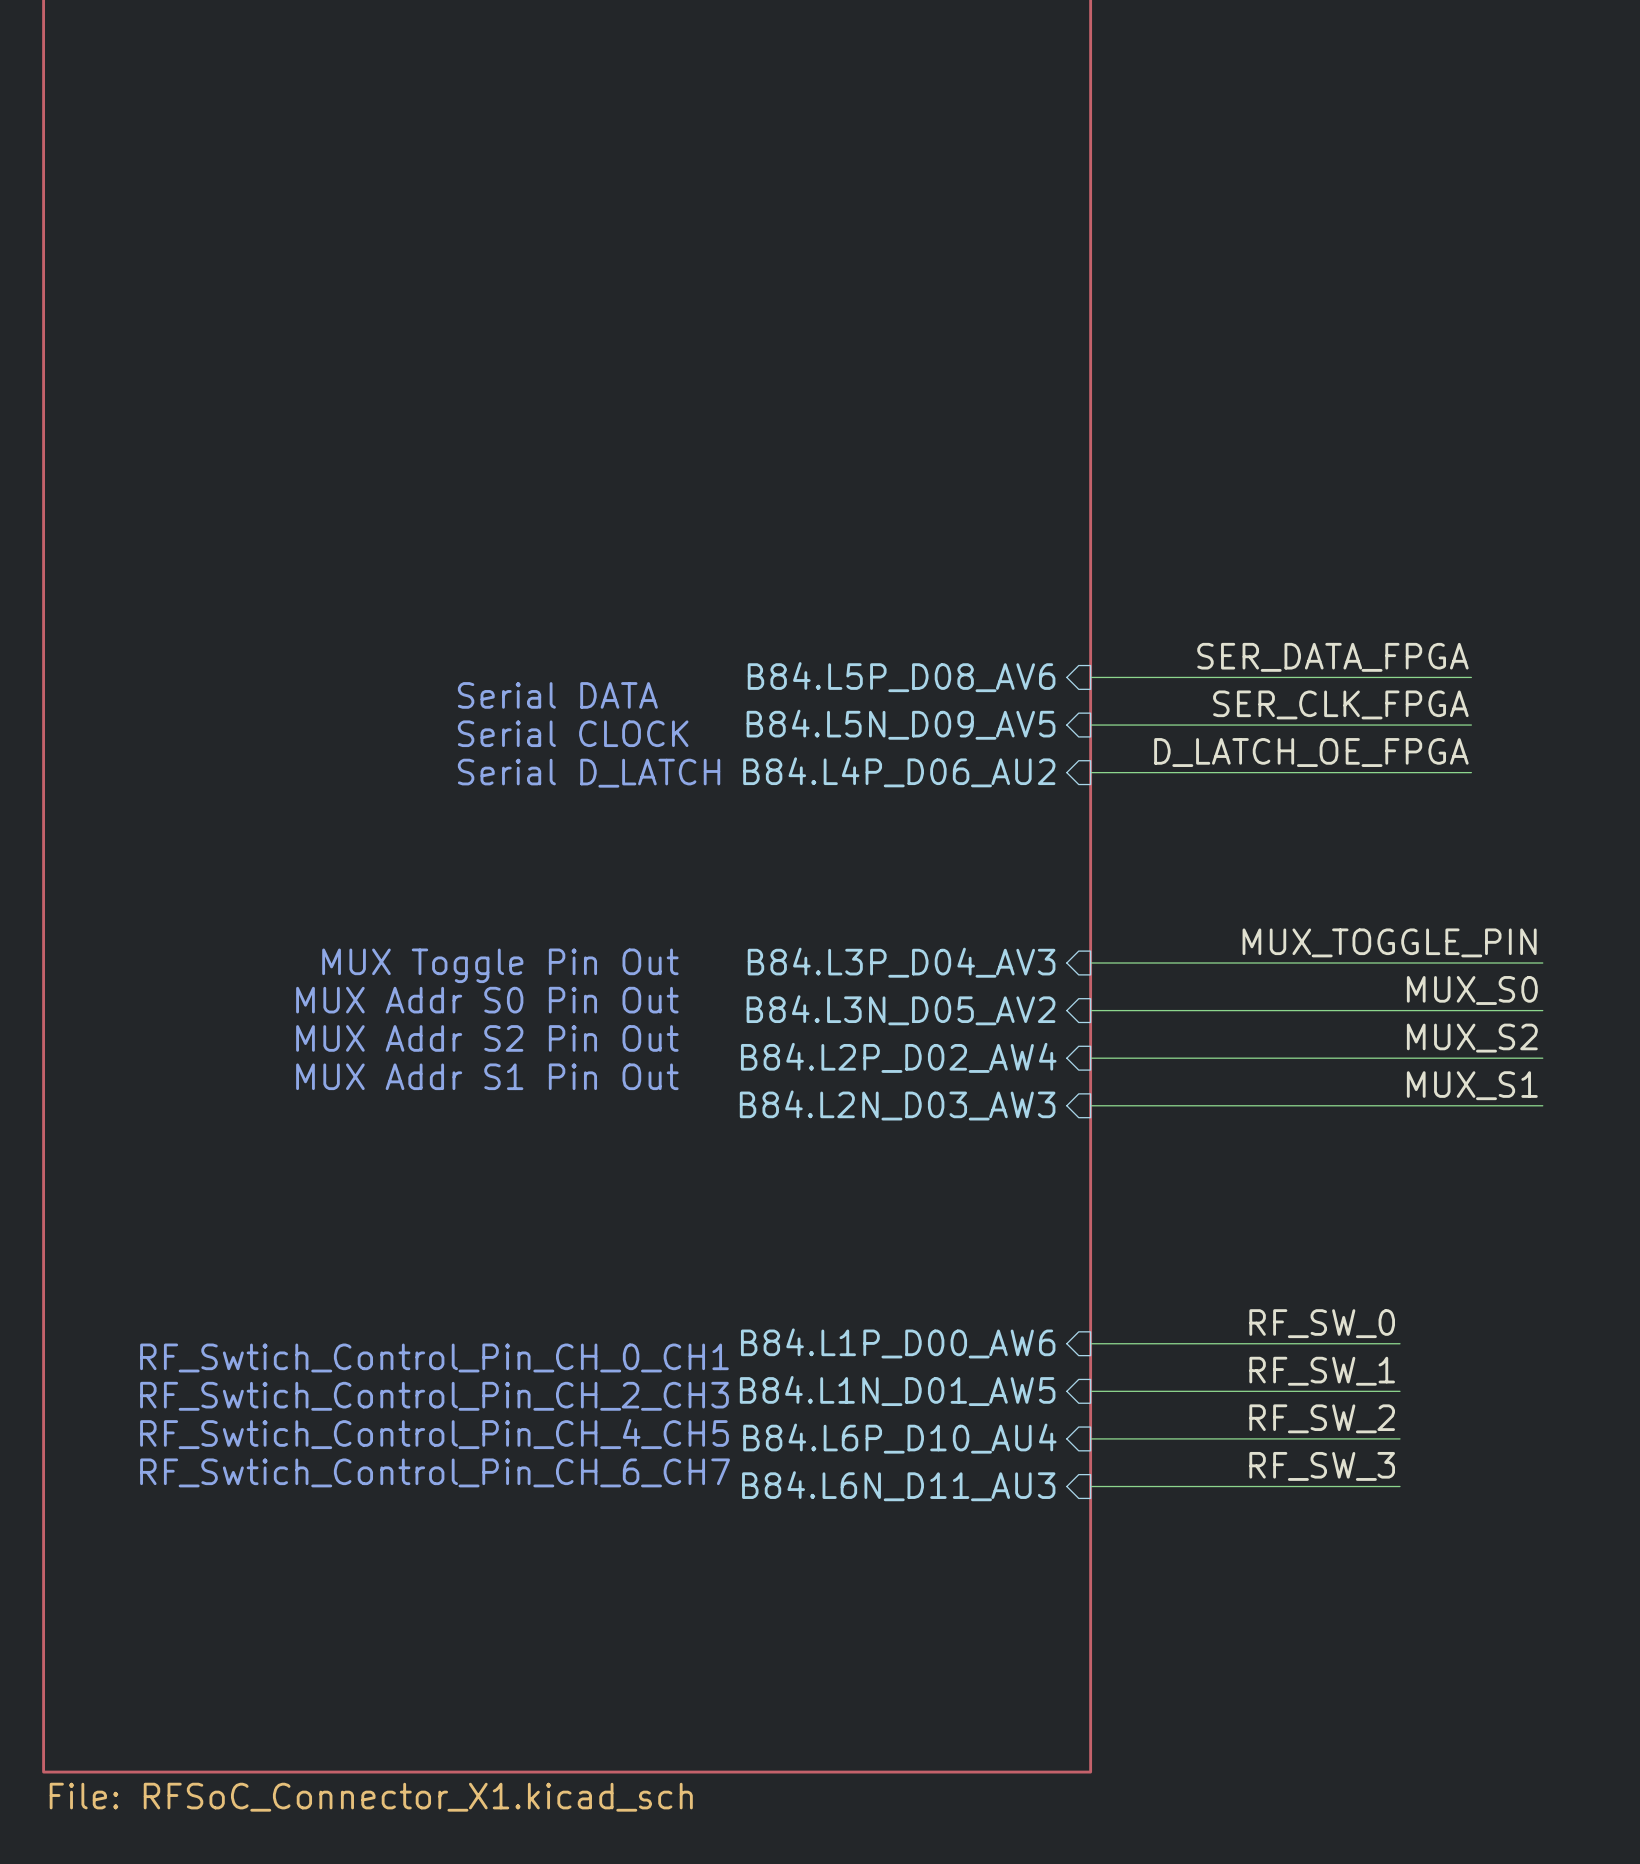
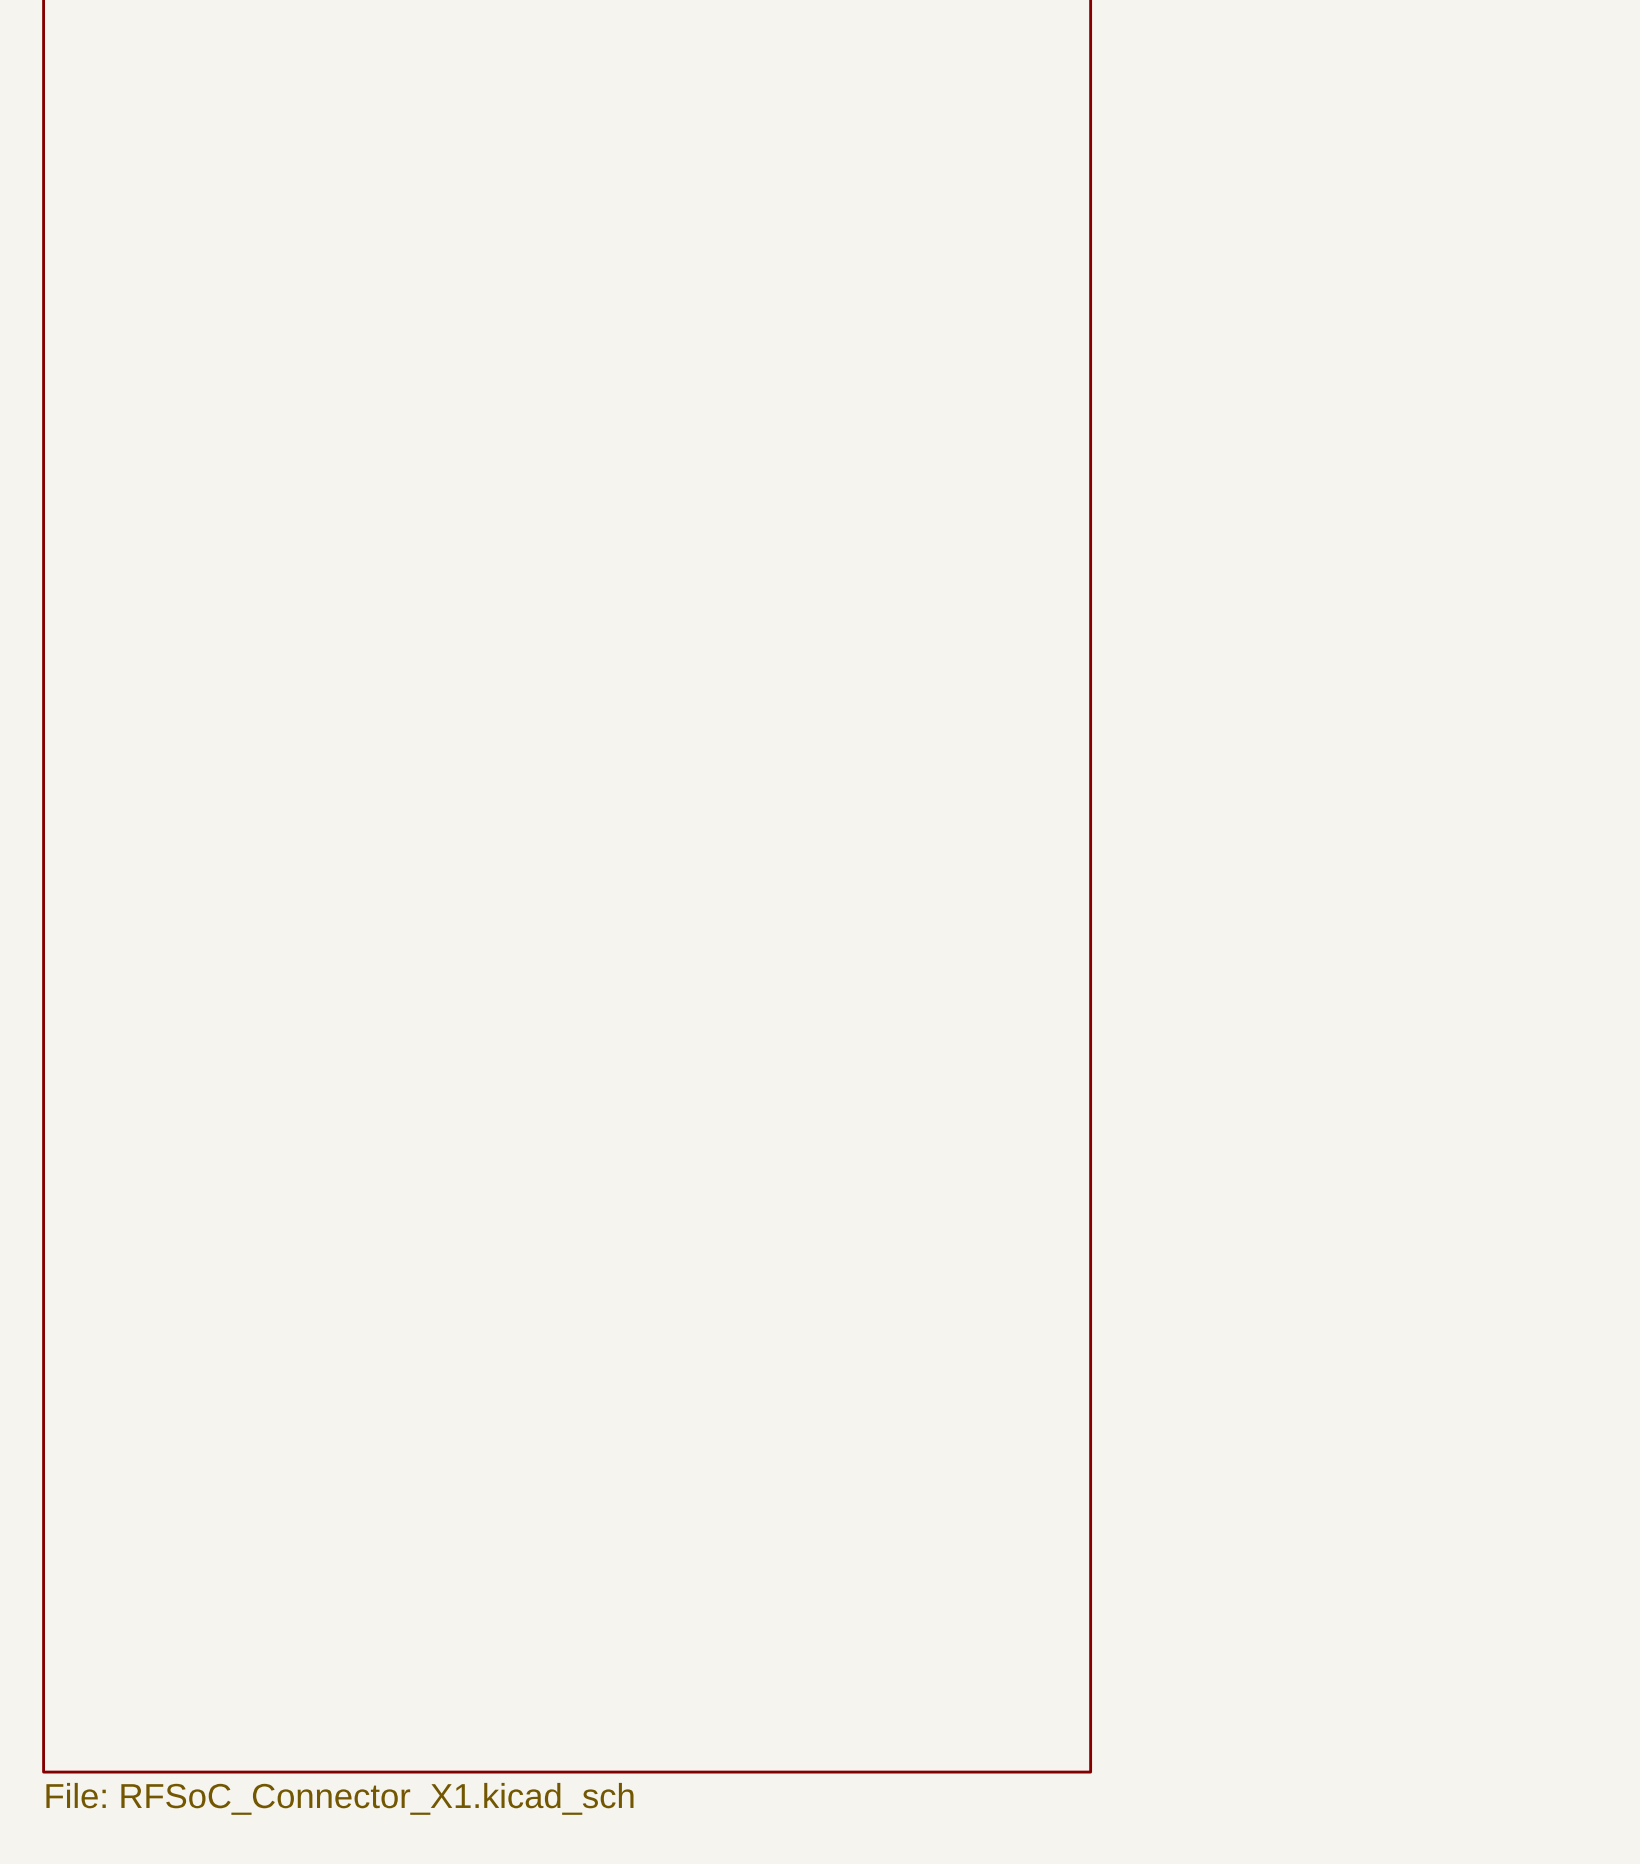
label: SER_DATA_FPGA (1332, 657) -> none
sheet pin: B84.L5P_D08_AV6 (901, 677) -> none
wire: (1090, 677) (1471, 677) -> none
text: Serial DATA (557, 695) -> none
label: SER_CLK_FPGA (1340, 704) -> none
sheet pin: B84.L5N_D09_AV5 (901, 724) -> none
wire: (1090, 725) (1471, 725) -> none
text: Serial CLOCK (573, 733) -> none
label: D_LATCH_OE_FPGA (1311, 752) -> none
sheet pin: B84.L4P_D06_AU2 (899, 772) -> none
wire: (1090, 772) (1471, 772) -> none
text: Serial D_LATCH (589, 773) -> none
label: MUX_TOGGLE_PIN (1389, 942) -> none
sheet pin: B84.L3P_D04_AV3 (901, 962) -> none
wire: (1090, 963) (1542, 963) -> none
text: MUX Toggle Pin Out (500, 965) -> none
label: MUX_S0 (1472, 990) -> none
text: MUX Addr S0 Pin Out (487, 1000) -> none
sheet pin: B84.L3N_D05_AV2 (901, 1010) -> none
wire: (1090, 1010) (1542, 1010) -> none
text: MUX Addr S2 Pin Out (487, 1038) -> none
label: MUX_S2 (1472, 1038) -> none
sheet pin: B84.L2P_D02_AW4 (898, 1057) -> none
wire: (1090, 1058) (1542, 1058) -> none
text: MUX Addr S1 Pin Out (487, 1076) -> none
label: MUX_S1 (1472, 1085) -> none
sheet pin: B84.L2N_D03_AW3 (897, 1105) -> none
wire: (1090, 1105) (1542, 1105) -> none
label: RF_SW_0 (1322, 1323) -> none
sheet pin: B84.L1P_D00_AW6 (898, 1343) -> none
wire: (1090, 1343) (1399, 1343) -> none
text: RF_Swtich_Control_Pin_CH_0_CH1 (434, 1357) -> none
label: RF_SW_1 (1322, 1371) -> none
sheet pin: B84.L1N_D01_AW5 (897, 1391) -> none
wire: (1090, 1391) (1399, 1391) -> none
text: RF_Swtich_Control_Pin_CH_2_CH3 (434, 1396) -> none
label: RF_SW_2 (1322, 1418) -> none
text: RF_Swtich_Control_Pin_CH_4_CH5 (434, 1434) -> none
sheet pin: B84.L6P_D10_AU4 (899, 1438) -> none
wire: (1090, 1438) (1399, 1438) -> none
label: RF_SW_3 (1322, 1466) -> none
text: RF_Swtich_Control_Pin_CH_6_CH7 (435, 1472) -> none
sheet pin: B84.L6N_D11_AU3 (898, 1486) -> none
wire: (1090, 1486) (1399, 1486) -> none

